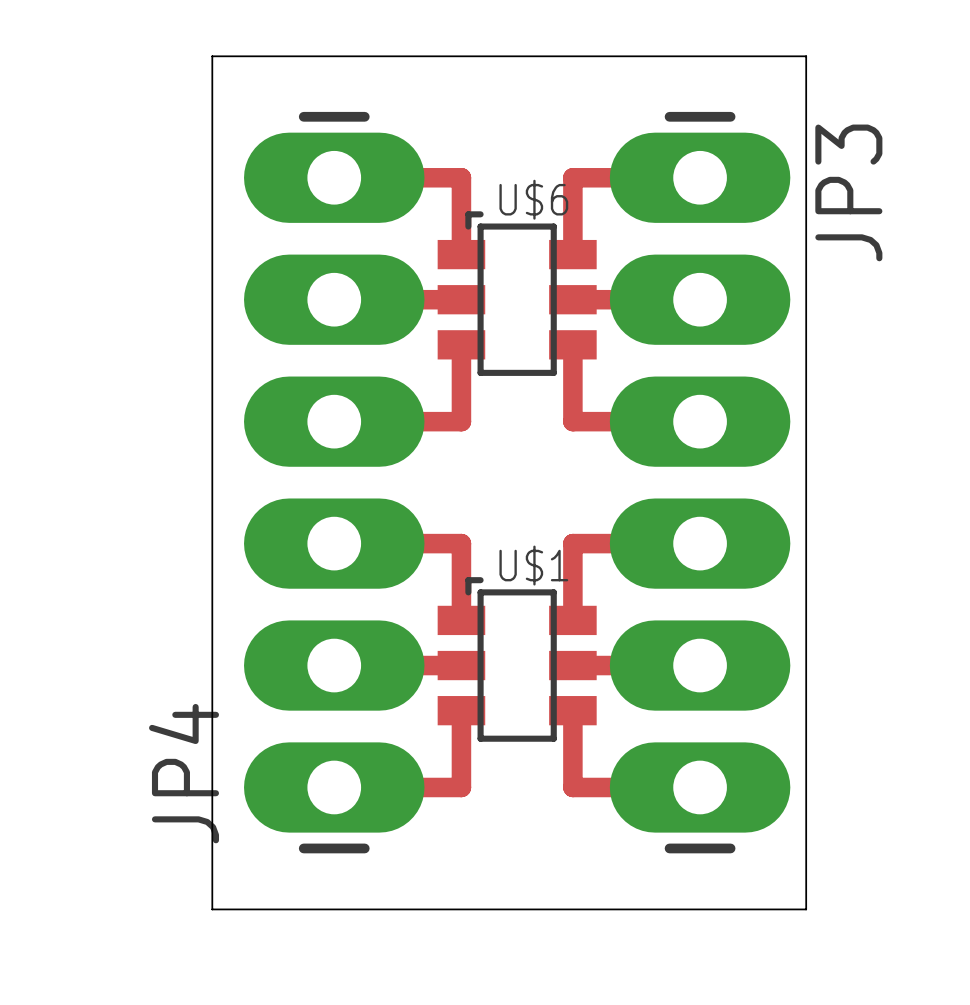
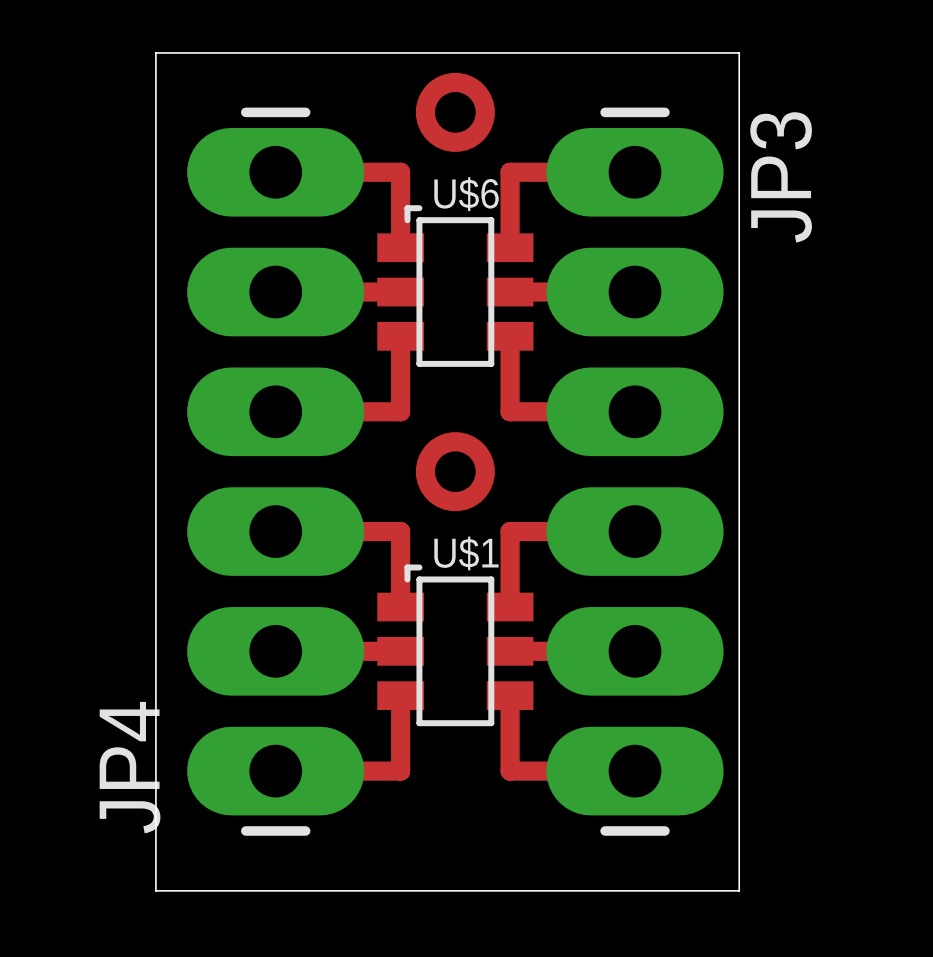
drawing: none -> [415, 72, 495, 152]
drawing: none -> [415, 432, 495, 512]

